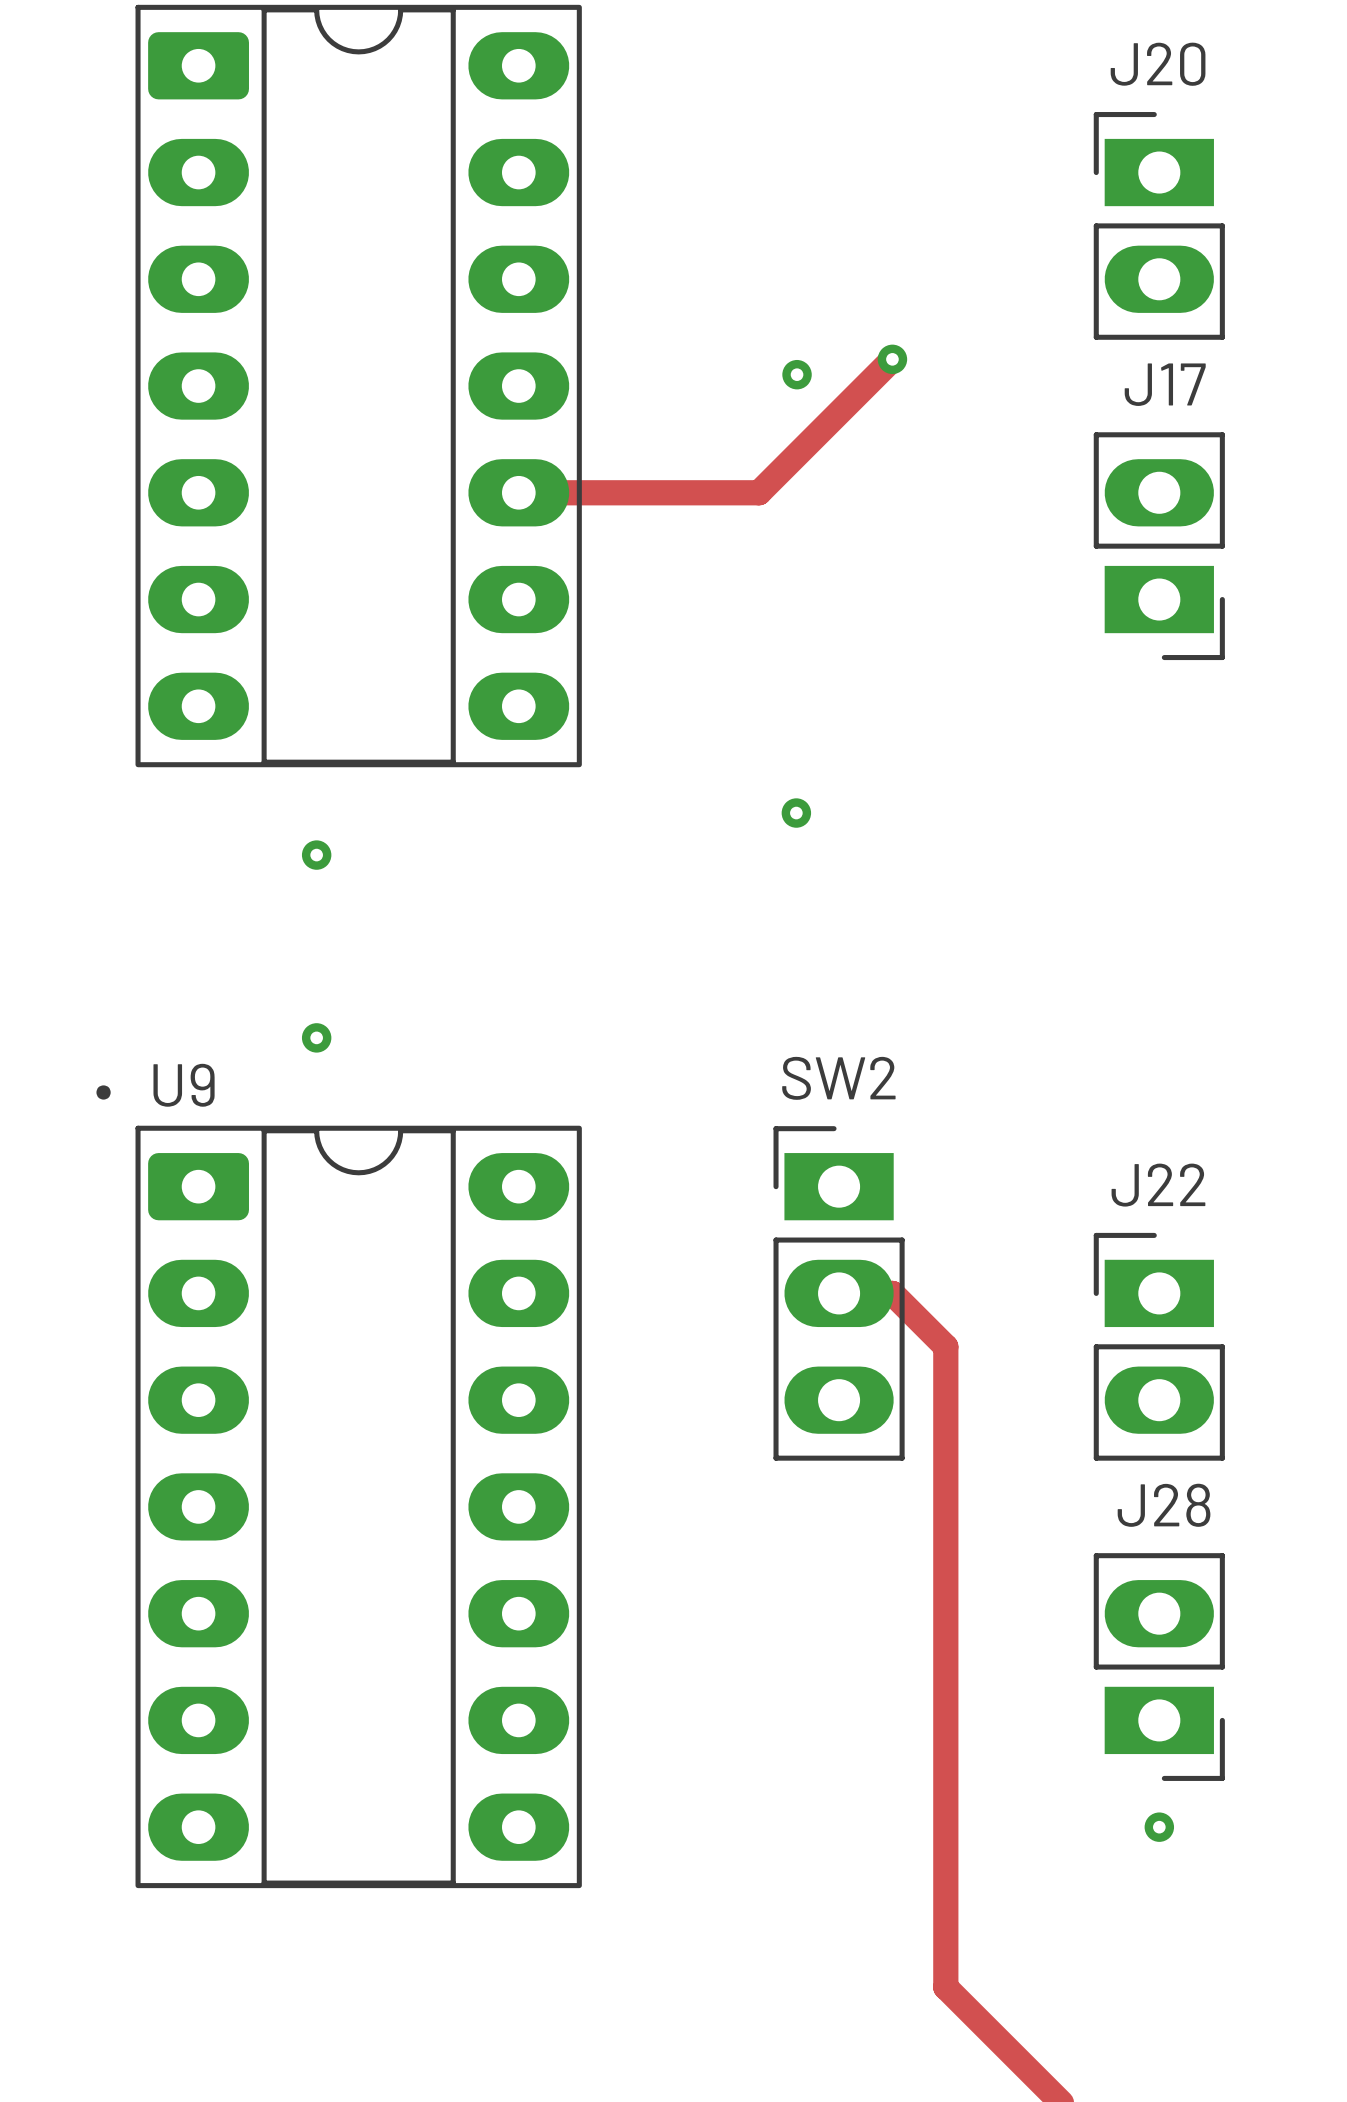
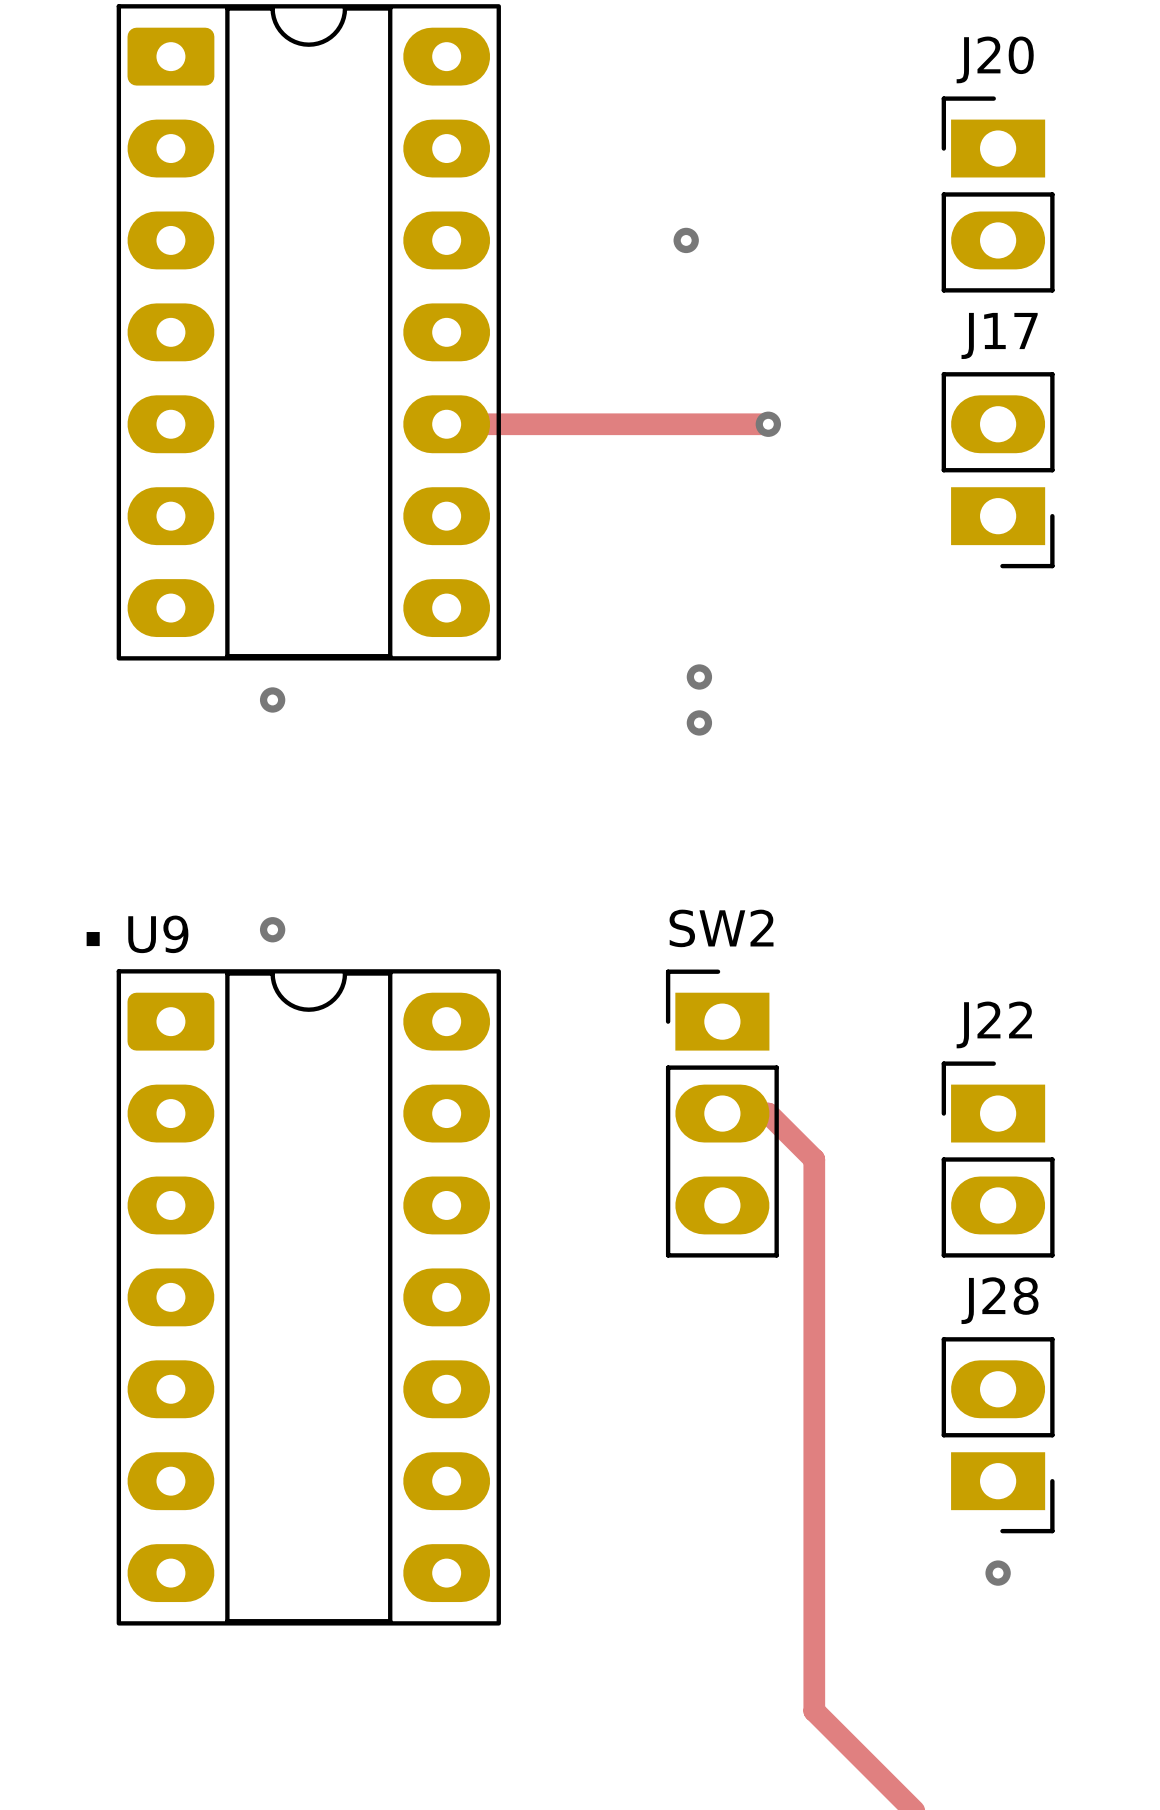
via: none -> (686, 240)
track: (892, 359) (759, 492) -> (768, 424) (653, 424)
via: (892, 359) -> none
via: (797, 374) -> none
via: none -> (768, 424)
via: none -> (699, 677)
via: (796, 813) -> none
via: none -> (699, 722)
via position: (316, 855) -> (272, 699)
via position: (316, 1037) -> (272, 929)

